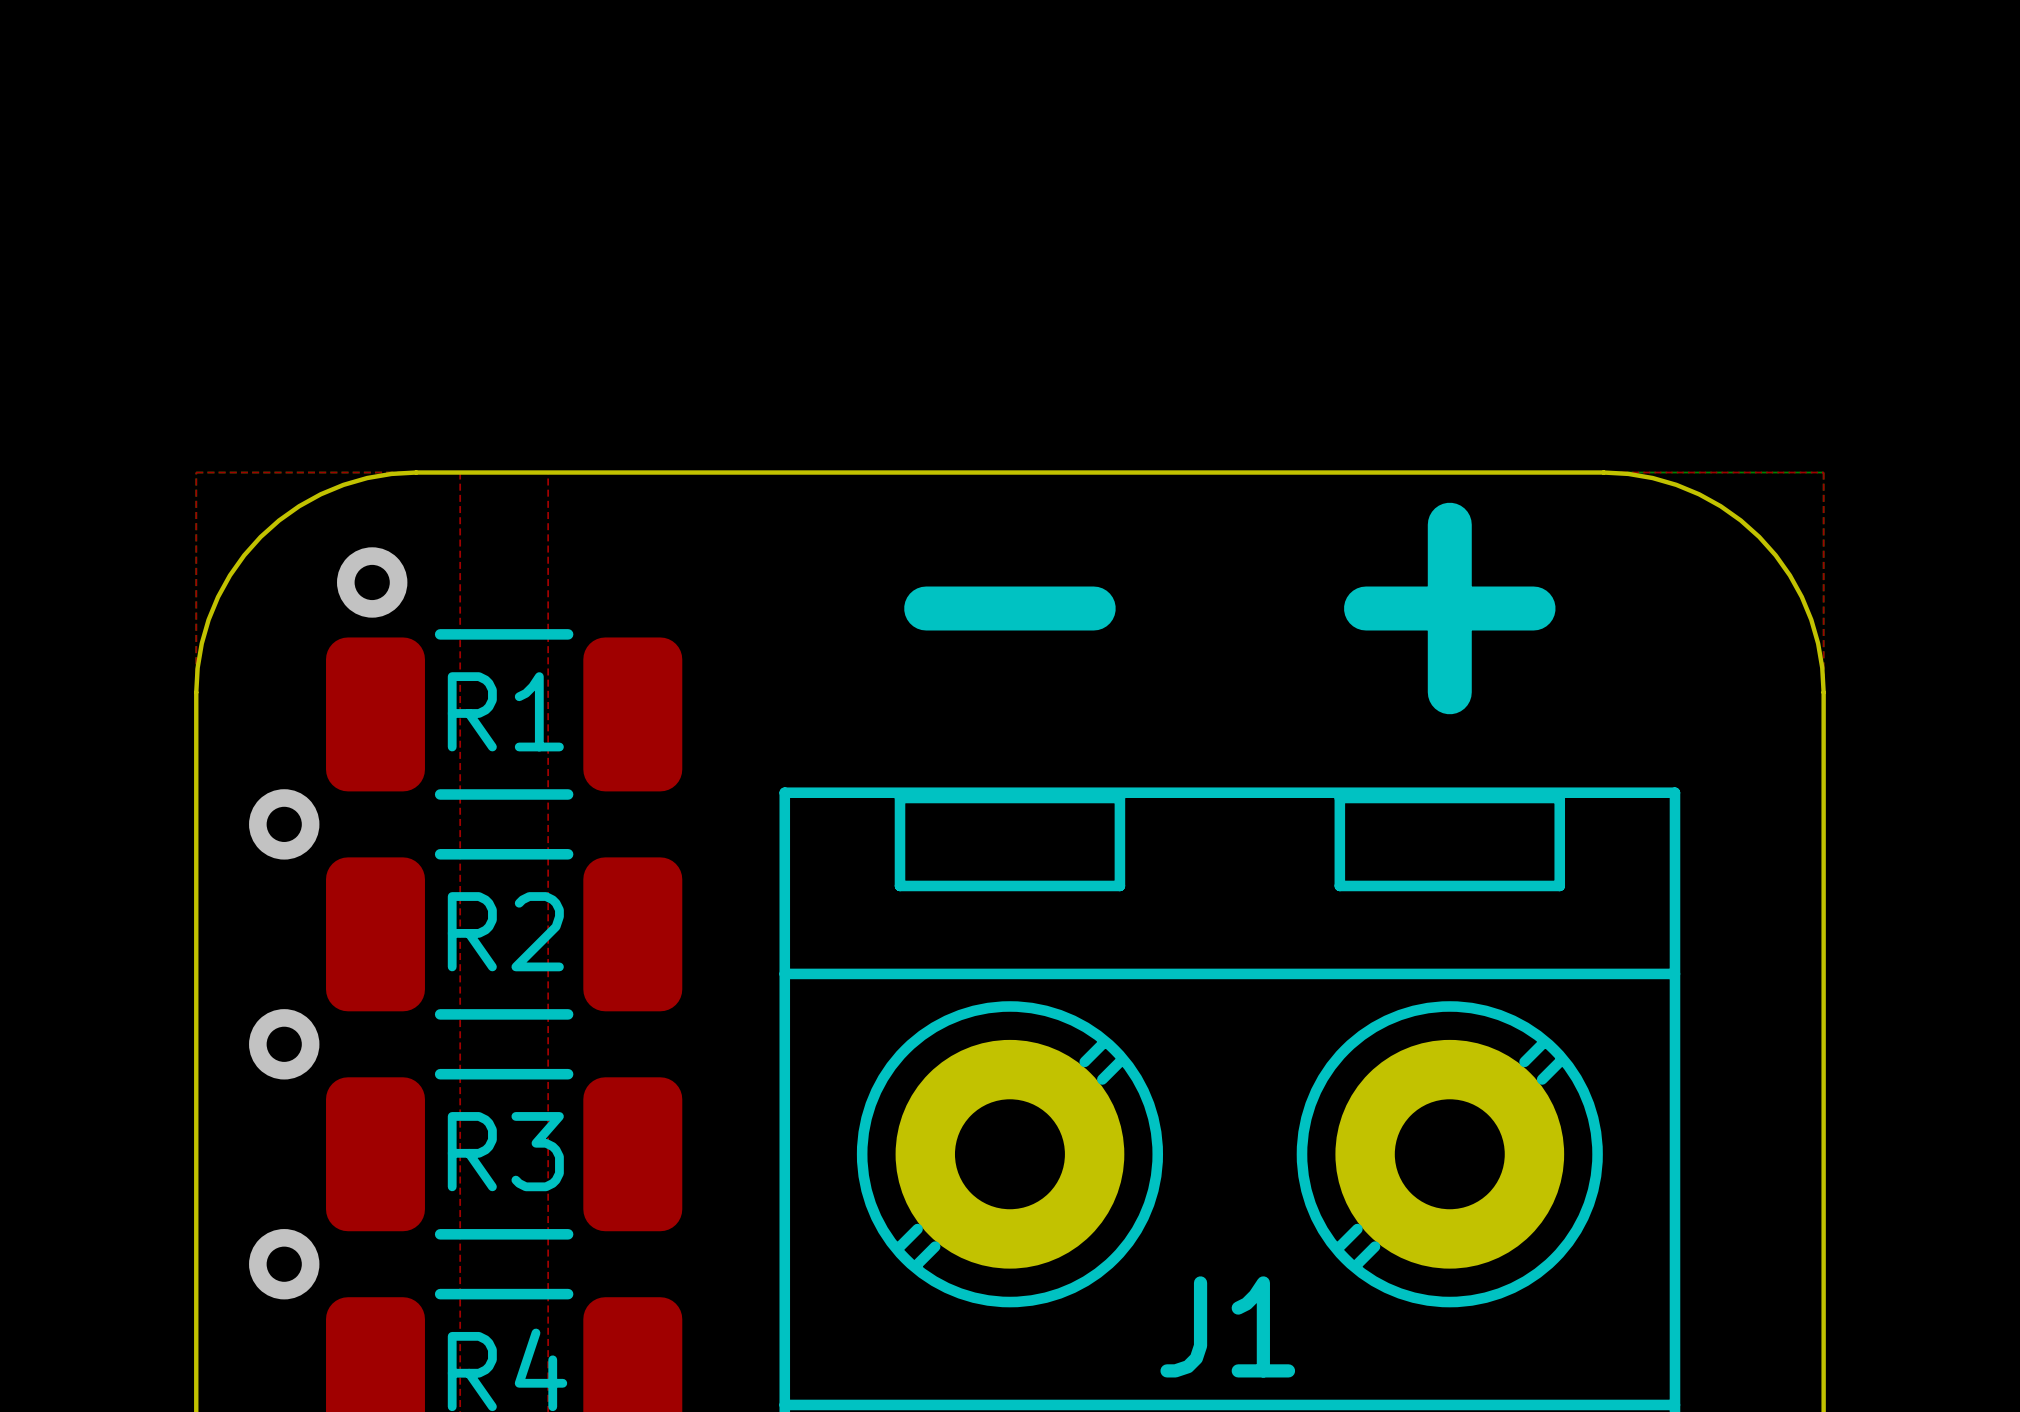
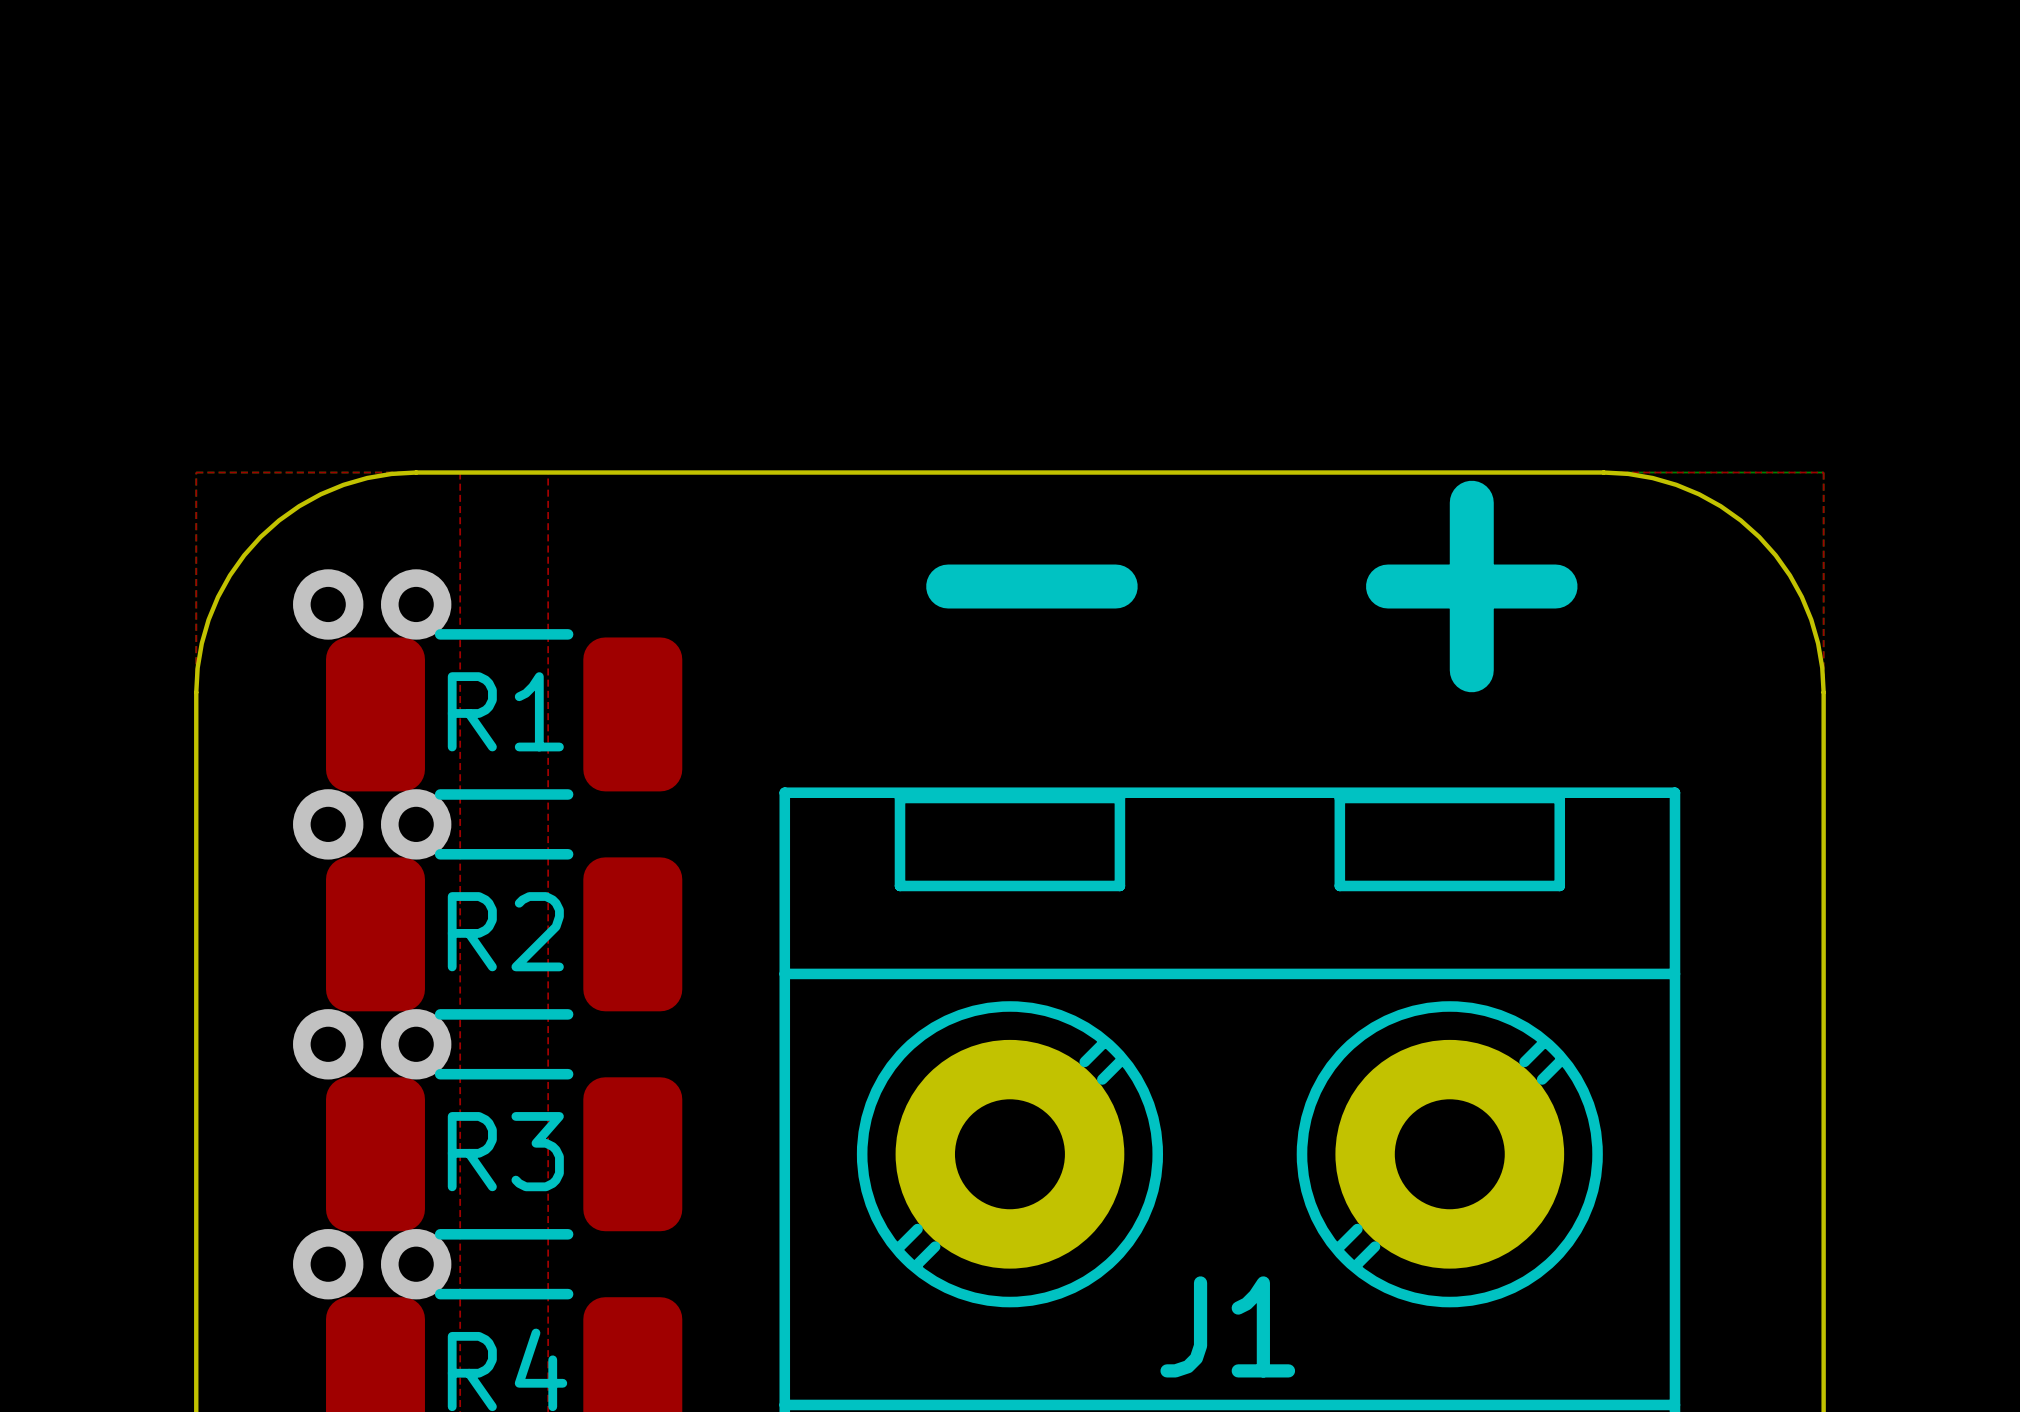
via: (372, 582) -> none
via: none -> (328, 604)
via: none -> (416, 604)
text position: - (1009, 608) -> - (1031, 586)
text position: + (1449, 608) -> + (1471, 586)
via position: (284, 824) -> (328, 824)
via: none -> (416, 824)
via position: (284, 1044) -> (328, 1044)
via: none -> (416, 1044)
via position: (284, 1264) -> (328, 1264)
via: none -> (416, 1264)

